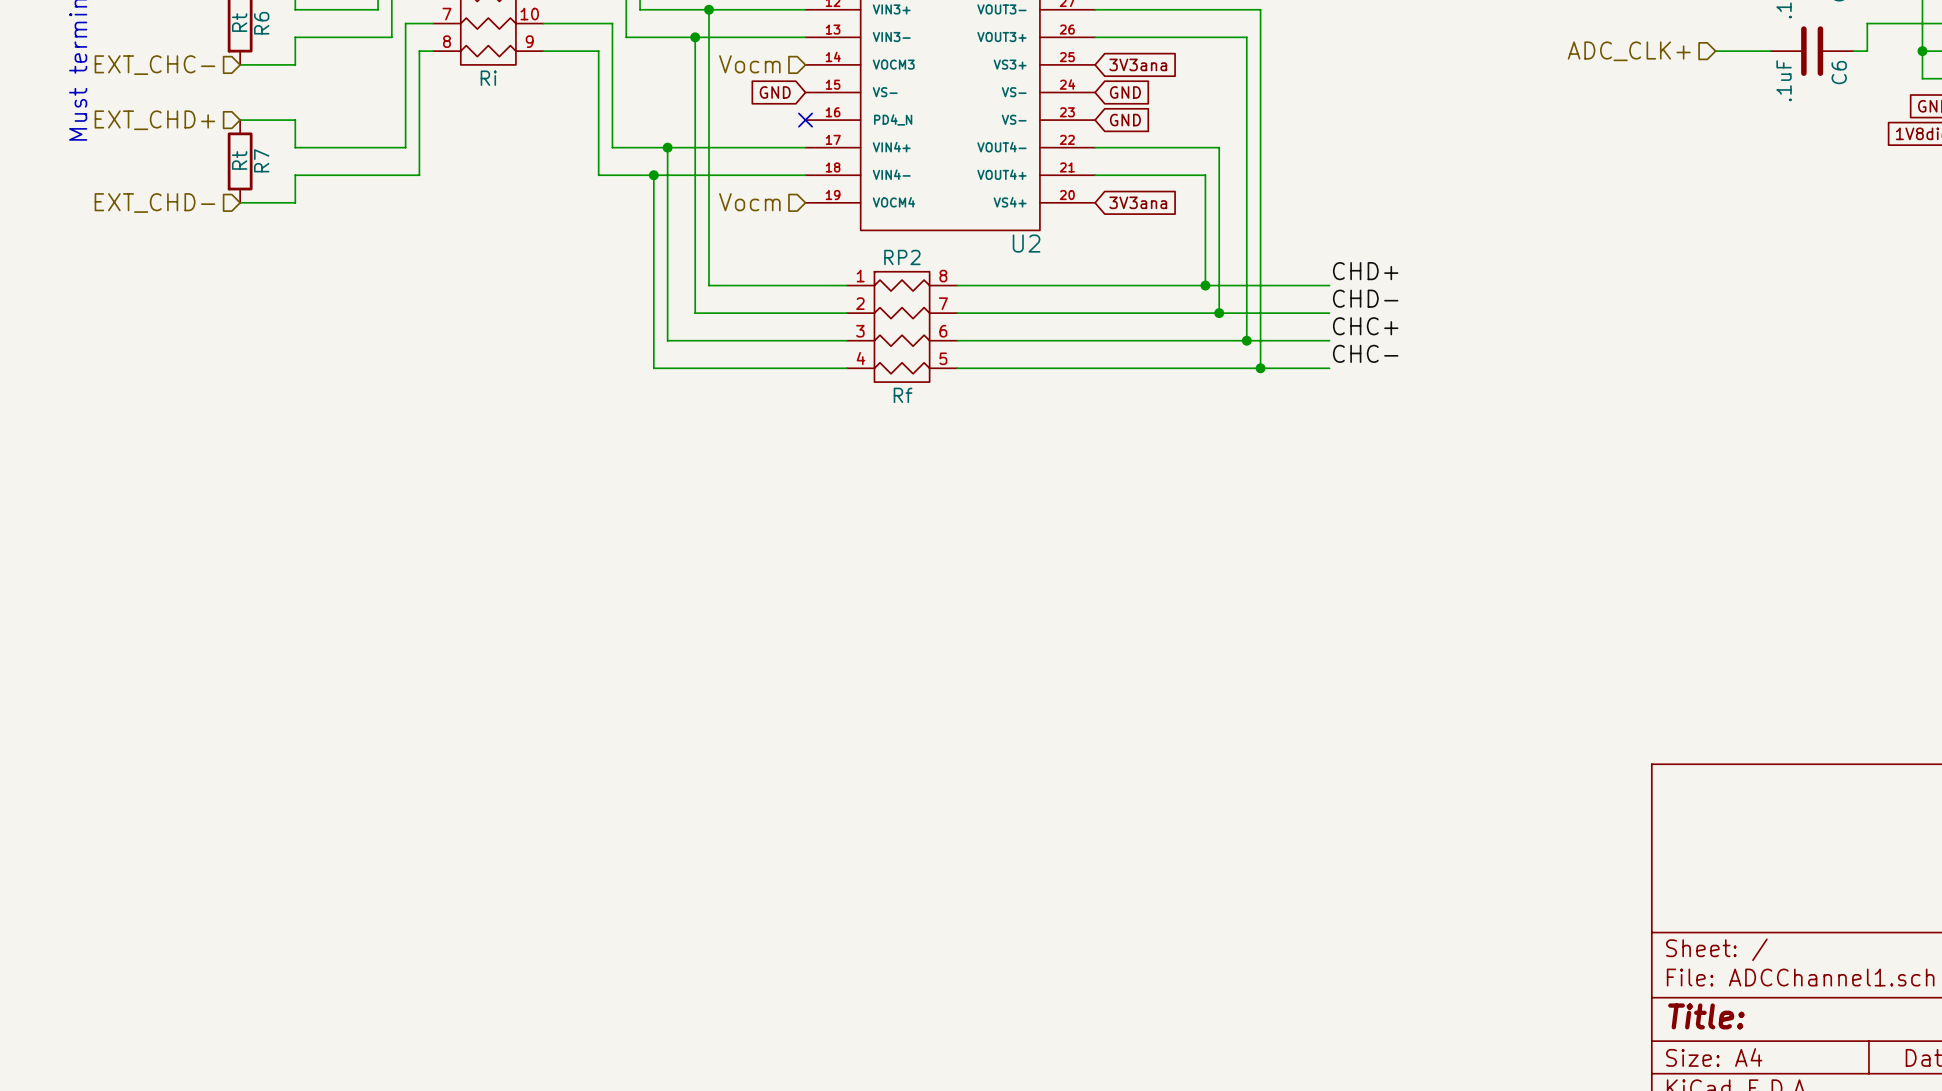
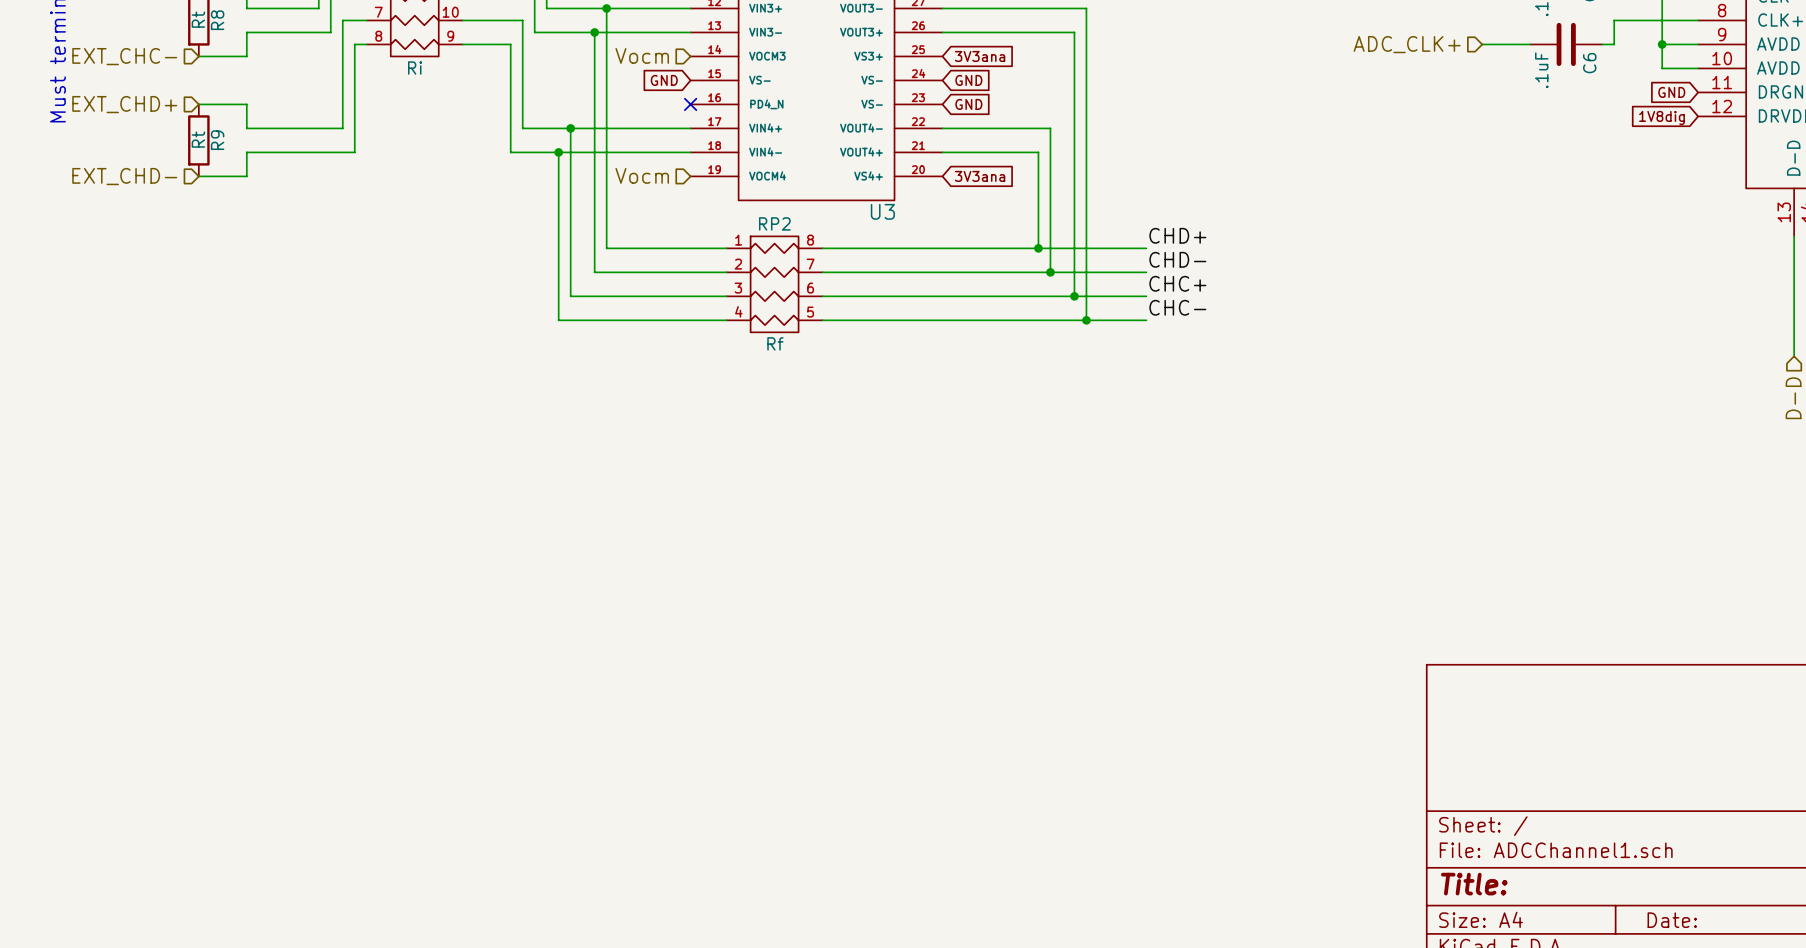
R6 name: R6 (261, 23) -> R8 (217, 20)
R7 name: R7 (261, 160) -> R9 (217, 140)
U2 name: U2 (1026, 243) -> U3 (882, 211)

